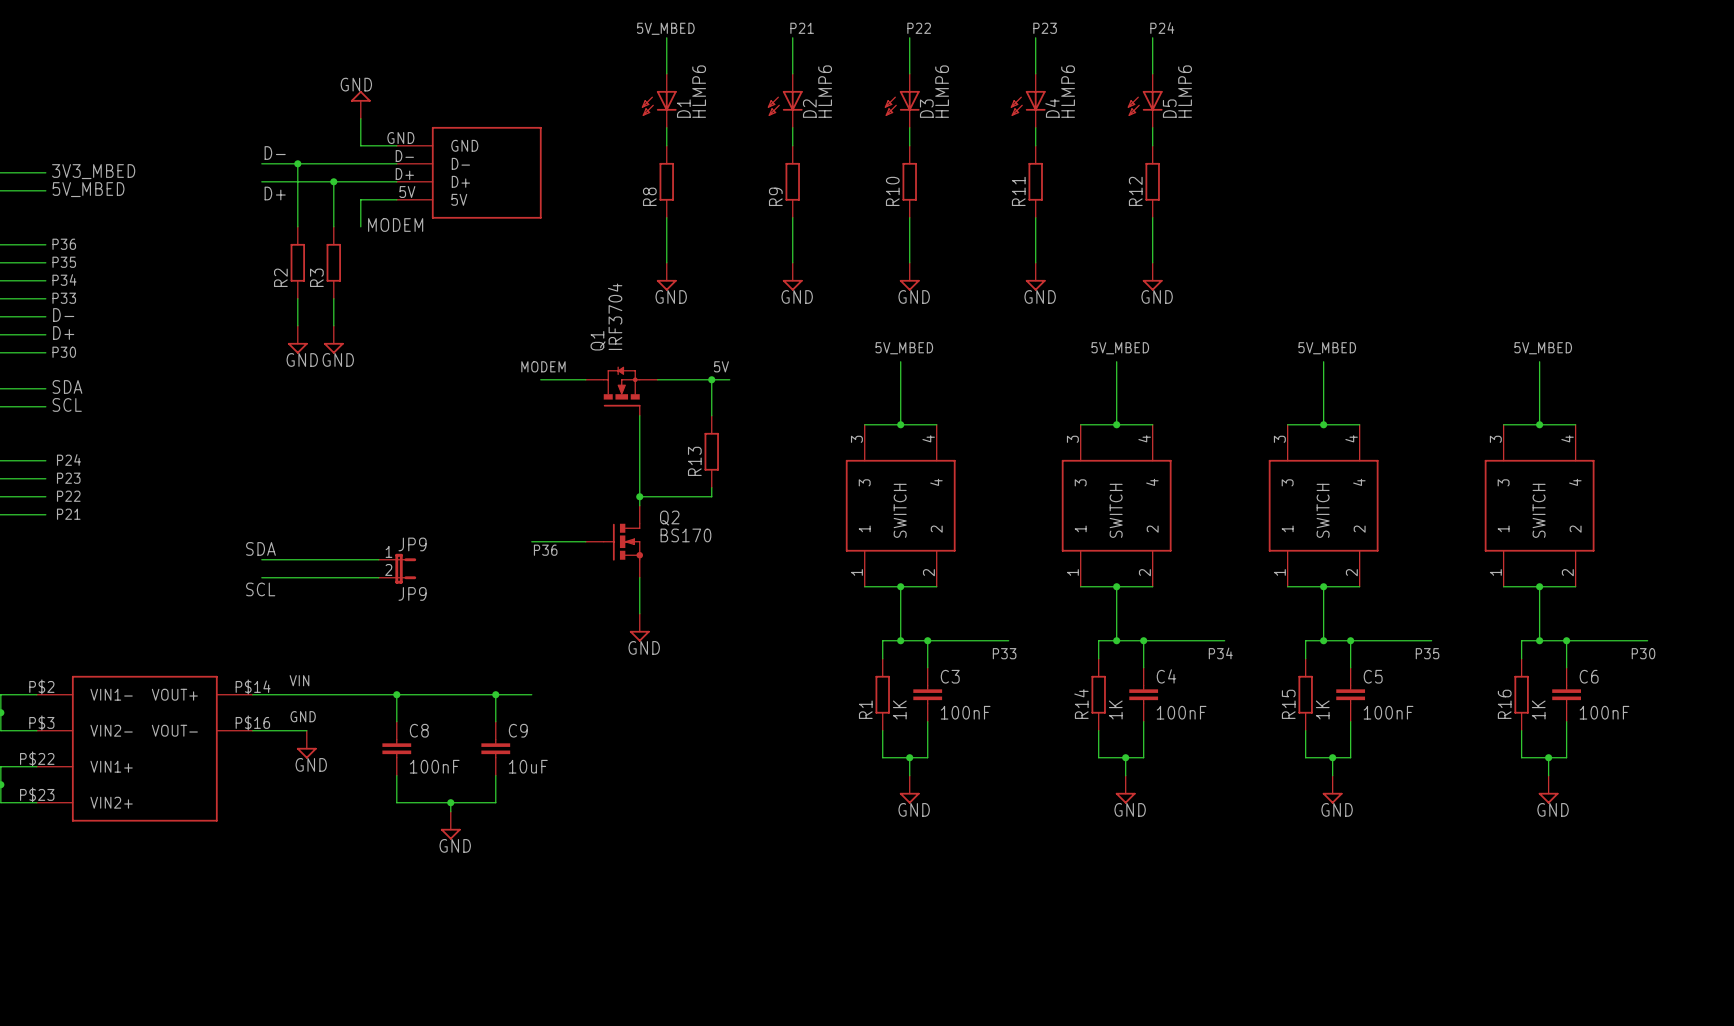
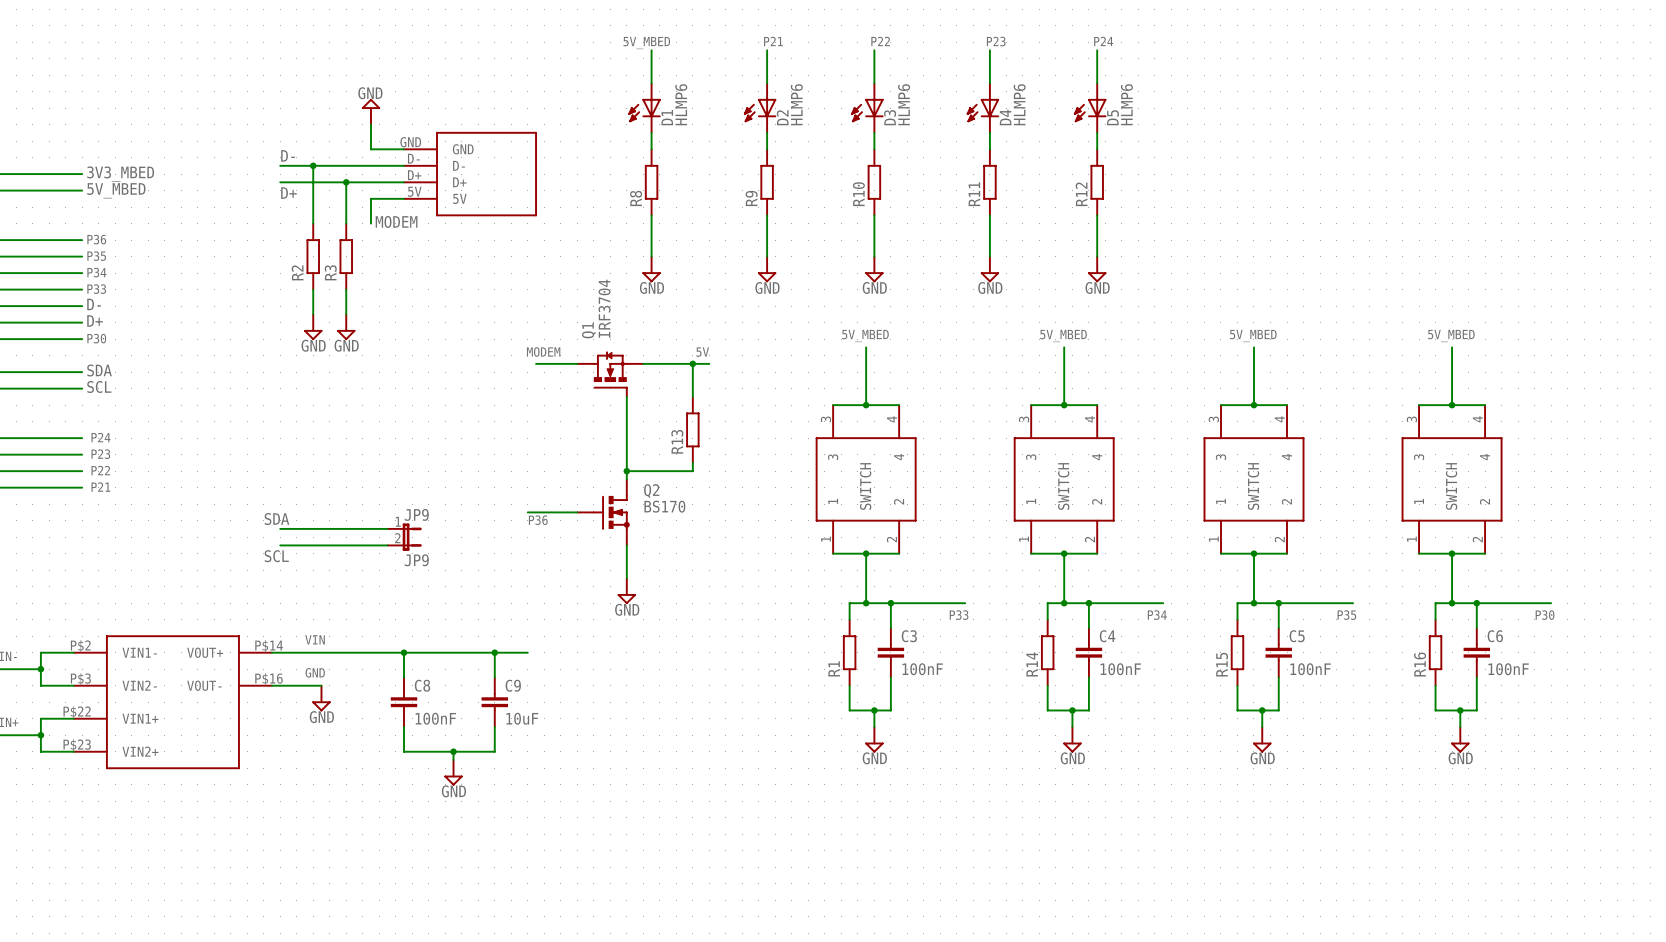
R1 value: 1K (899, 709) -> none
R14 value: 1K (1115, 709) -> none
R15 value: 1K (1322, 709) -> none
R16 value: 1K (1538, 709) -> none

